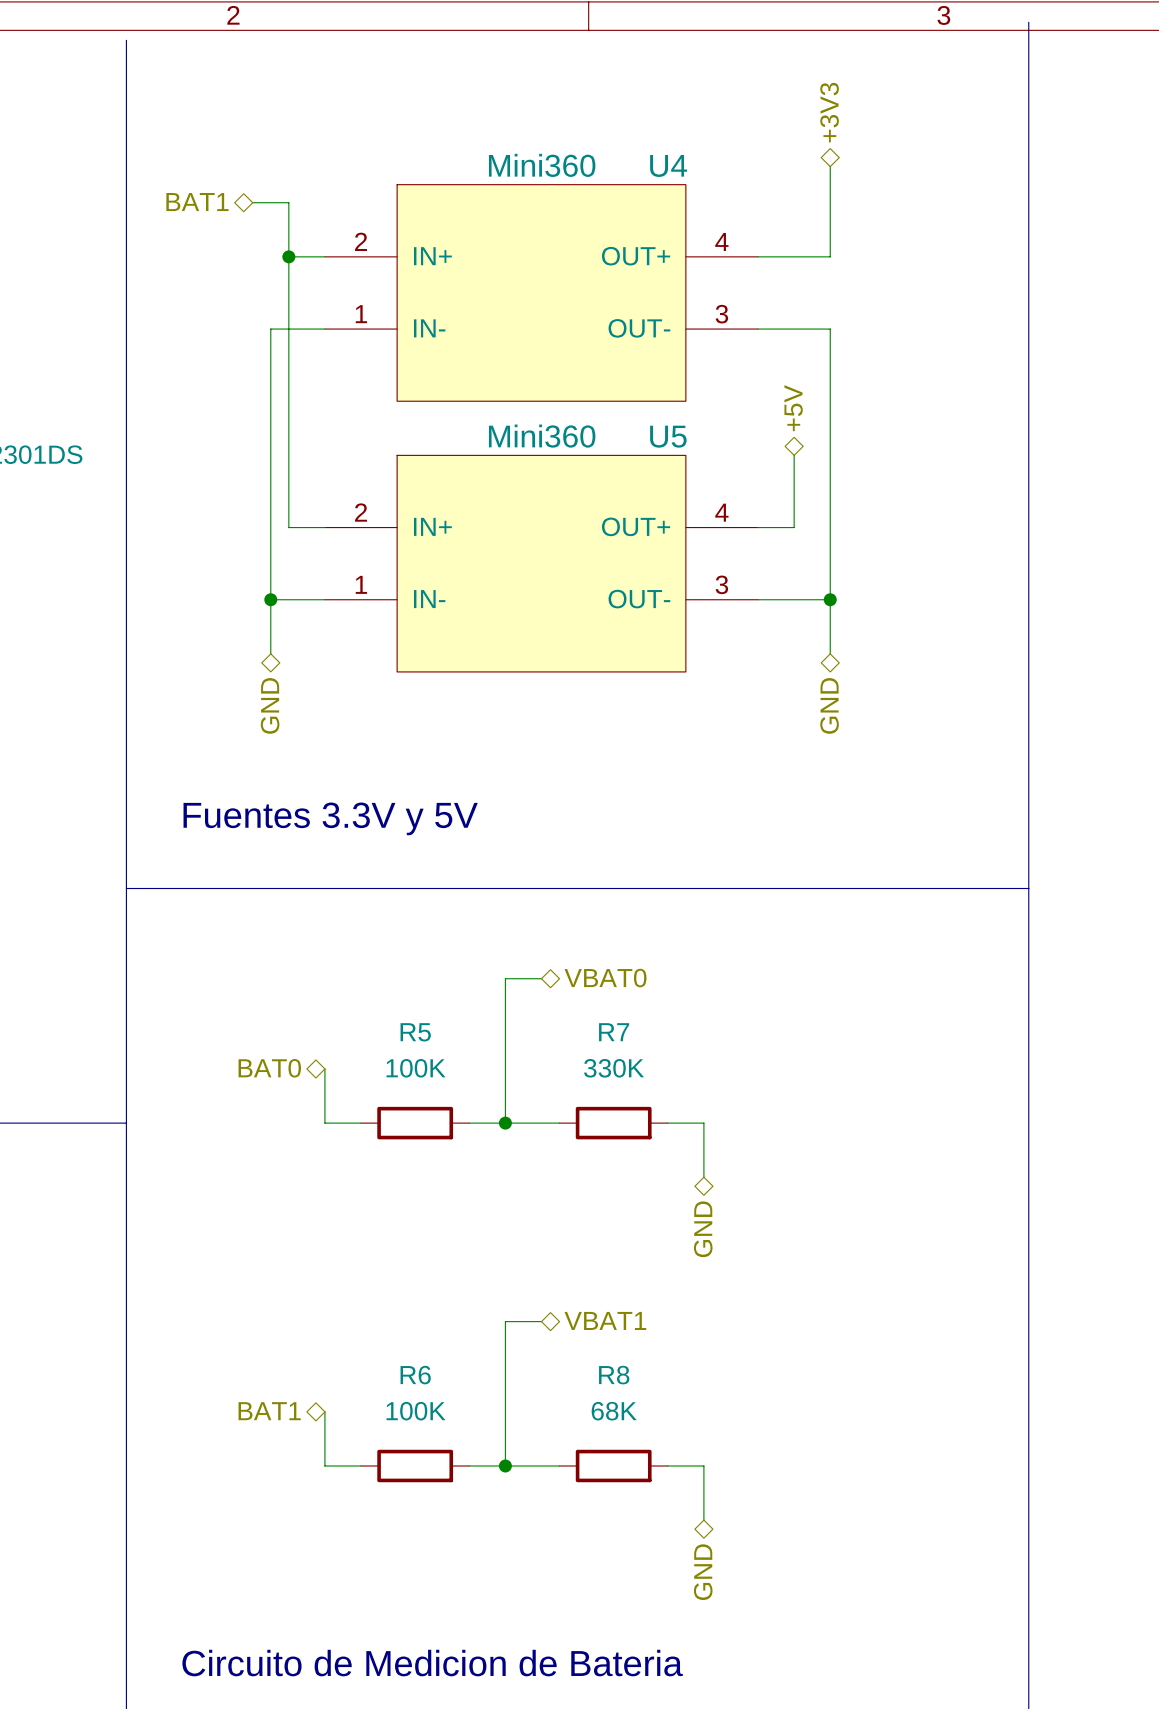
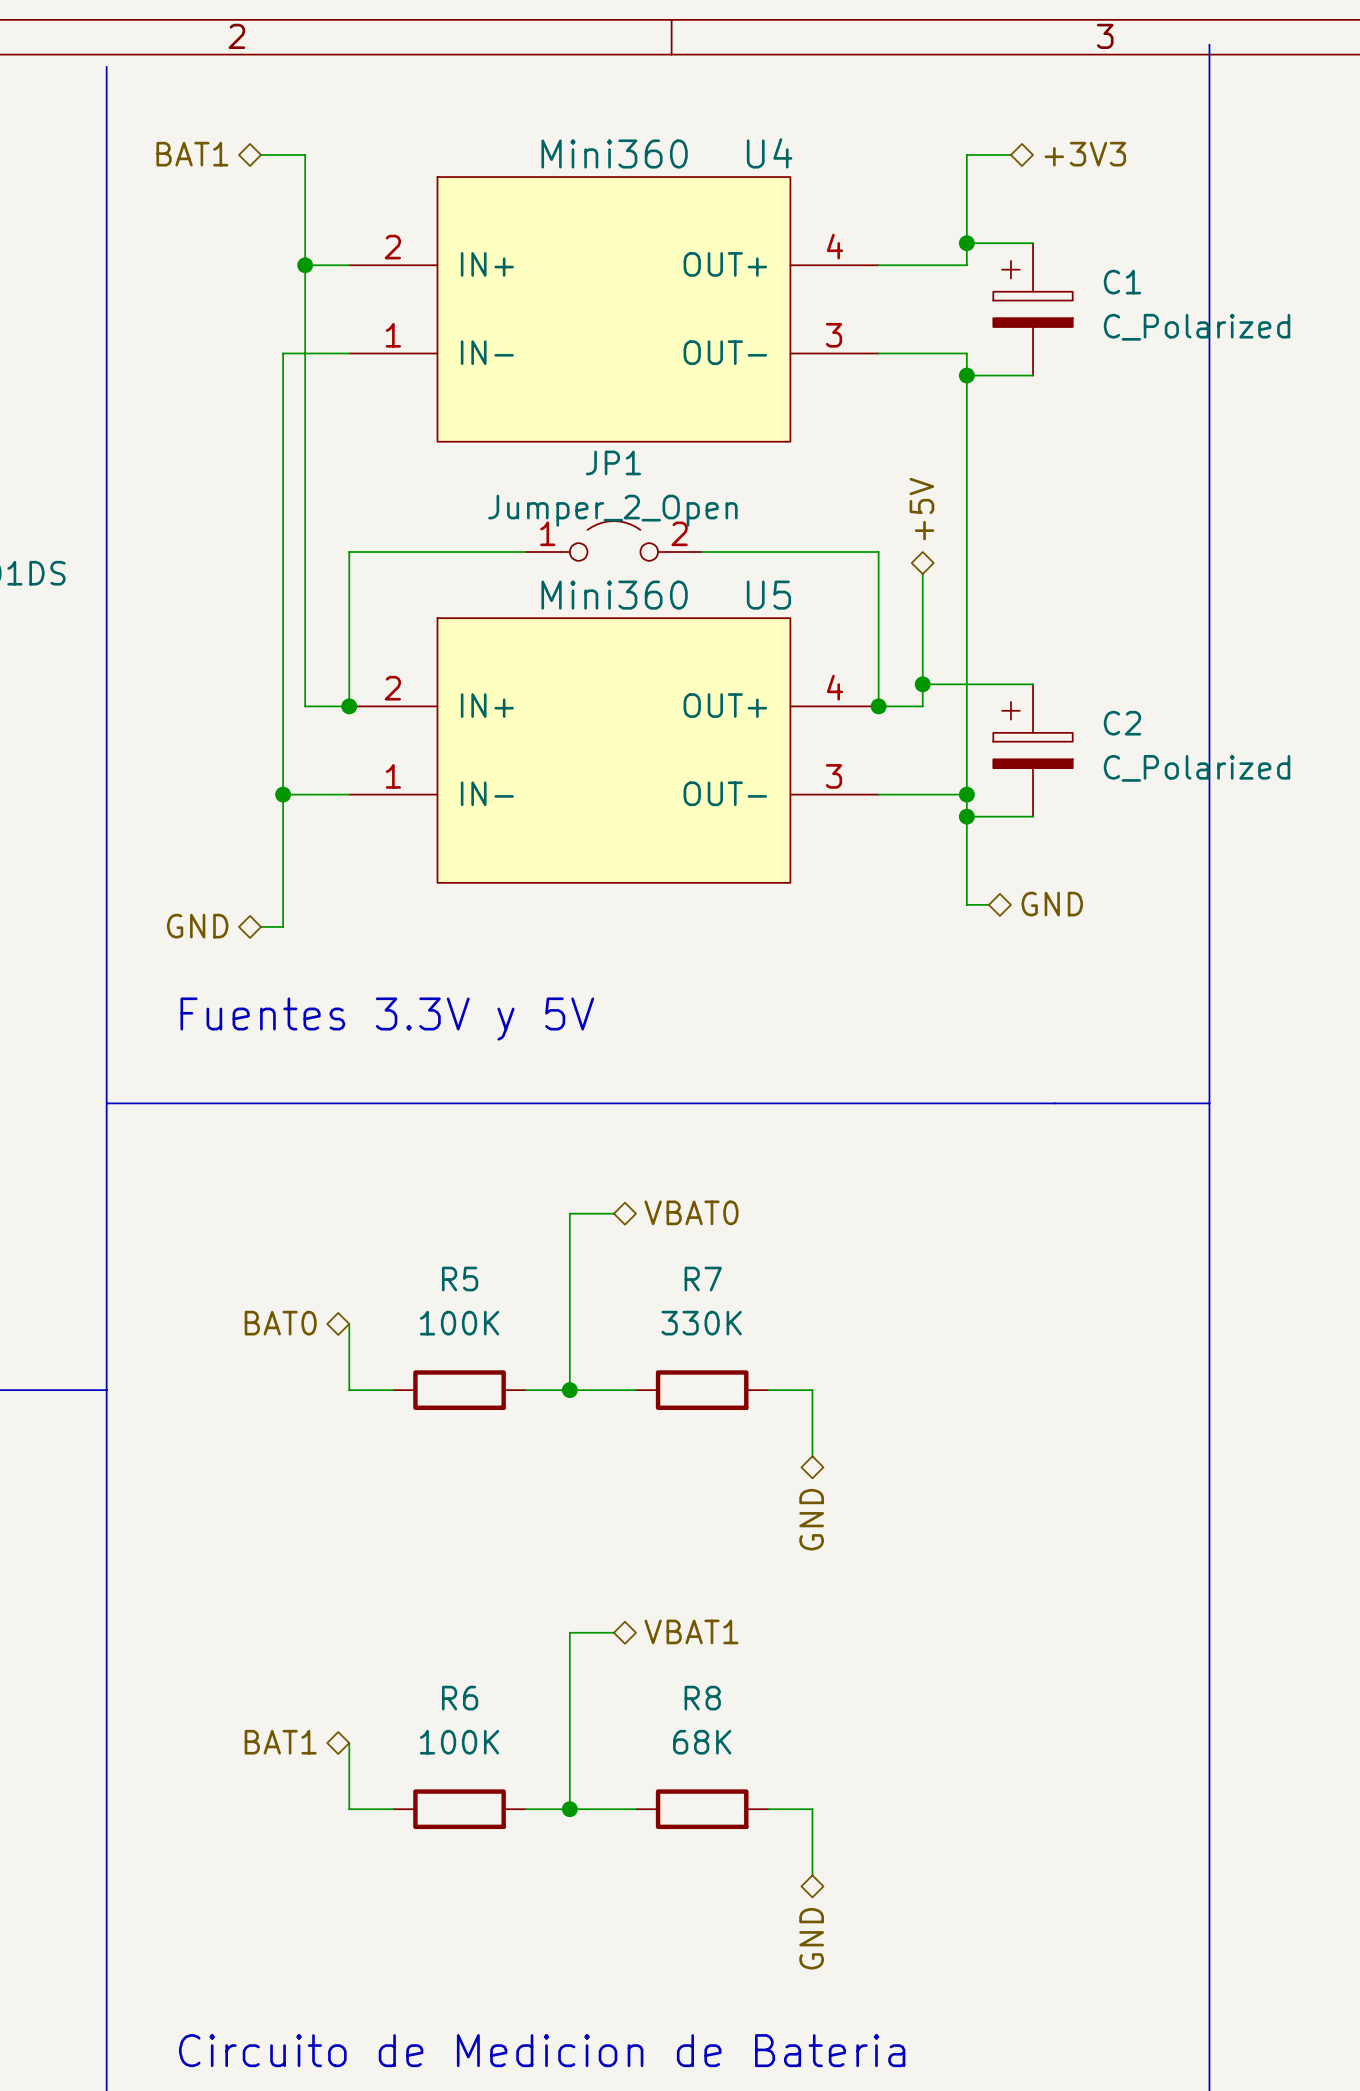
wire: none -> (261, 154) (305, 154) (305, 265) (349, 265)
hierarchical label rotation: 0° (829, 112) -> 90° clockwise (1085, 154)
hierarchical label position: +3V3 (829, 112) -> +3V3 (1085, 154)
wire: none -> (1010, 154) (966, 154) (966, 221)
wire: none -> (966, 243) (1033, 243)
junction: none -> (966, 243)
hierarchical label position: BAT1 (197, 202) -> BAT1 (192, 154)
wire: (252, 202) (288, 202) -> none
wire: (830, 202) (830, 256) (758, 256) -> (966, 265) (878, 265)
C1: none -> C_Polarized (1033, 309)
wire: (288, 256) (324, 256) -> none
junction position: (288, 256) -> (305, 265)
U4 position: (541, 292) -> (613, 309)
wire: none -> (966, 375) (1033, 375)
junction: none -> (966, 375)
wire: (270, 329) (324, 329) -> (283, 419) (283, 353) (349, 353)
wire: (758, 329) (830, 329) -> (878, 353) (966, 353) (966, 419)
JP1: none -> Jumper_2_Open (613, 540)
wire: (288, 527) (324, 527) -> (305, 662) (305, 706) (349, 706) (349, 551) (525, 551)
wire: (758, 527) (794, 527) -> (702, 551) (878, 551) (878, 706) (922, 706) (922, 662)
wire: none -> (922, 684) (1033, 684)
junction: none -> (922, 684)
junction: none -> (349, 706)
U5 position: (541, 563) -> (613, 750)
junction: none -> (878, 706)
wire: (270, 599) (324, 599) -> (283, 794) (349, 794)
junction: (270, 599) -> none
wire: (758, 599) (830, 599) -> (878, 794) (966, 794)
junction: (830, 599) -> none
C2: none -> C_Polarized (1033, 750)
junction: none -> (283, 794)
junction: none -> (966, 794)
wire: none -> (283, 816) (283, 926) (261, 926)
junction: none -> (966, 816)
wire: none -> (1033, 816) (966, 816) (966, 904) (988, 904)
hierarchical label rotation: 0° (270, 705) -> 90° clockwise (197, 926)
hierarchical label position: GND (270, 705) -> GND (197, 926)
hierarchical label rotation: 0° (829, 705) -> 90° counterclockwise (1052, 904)
hierarchical label position: GND (829, 705) -> GND (1052, 904)

